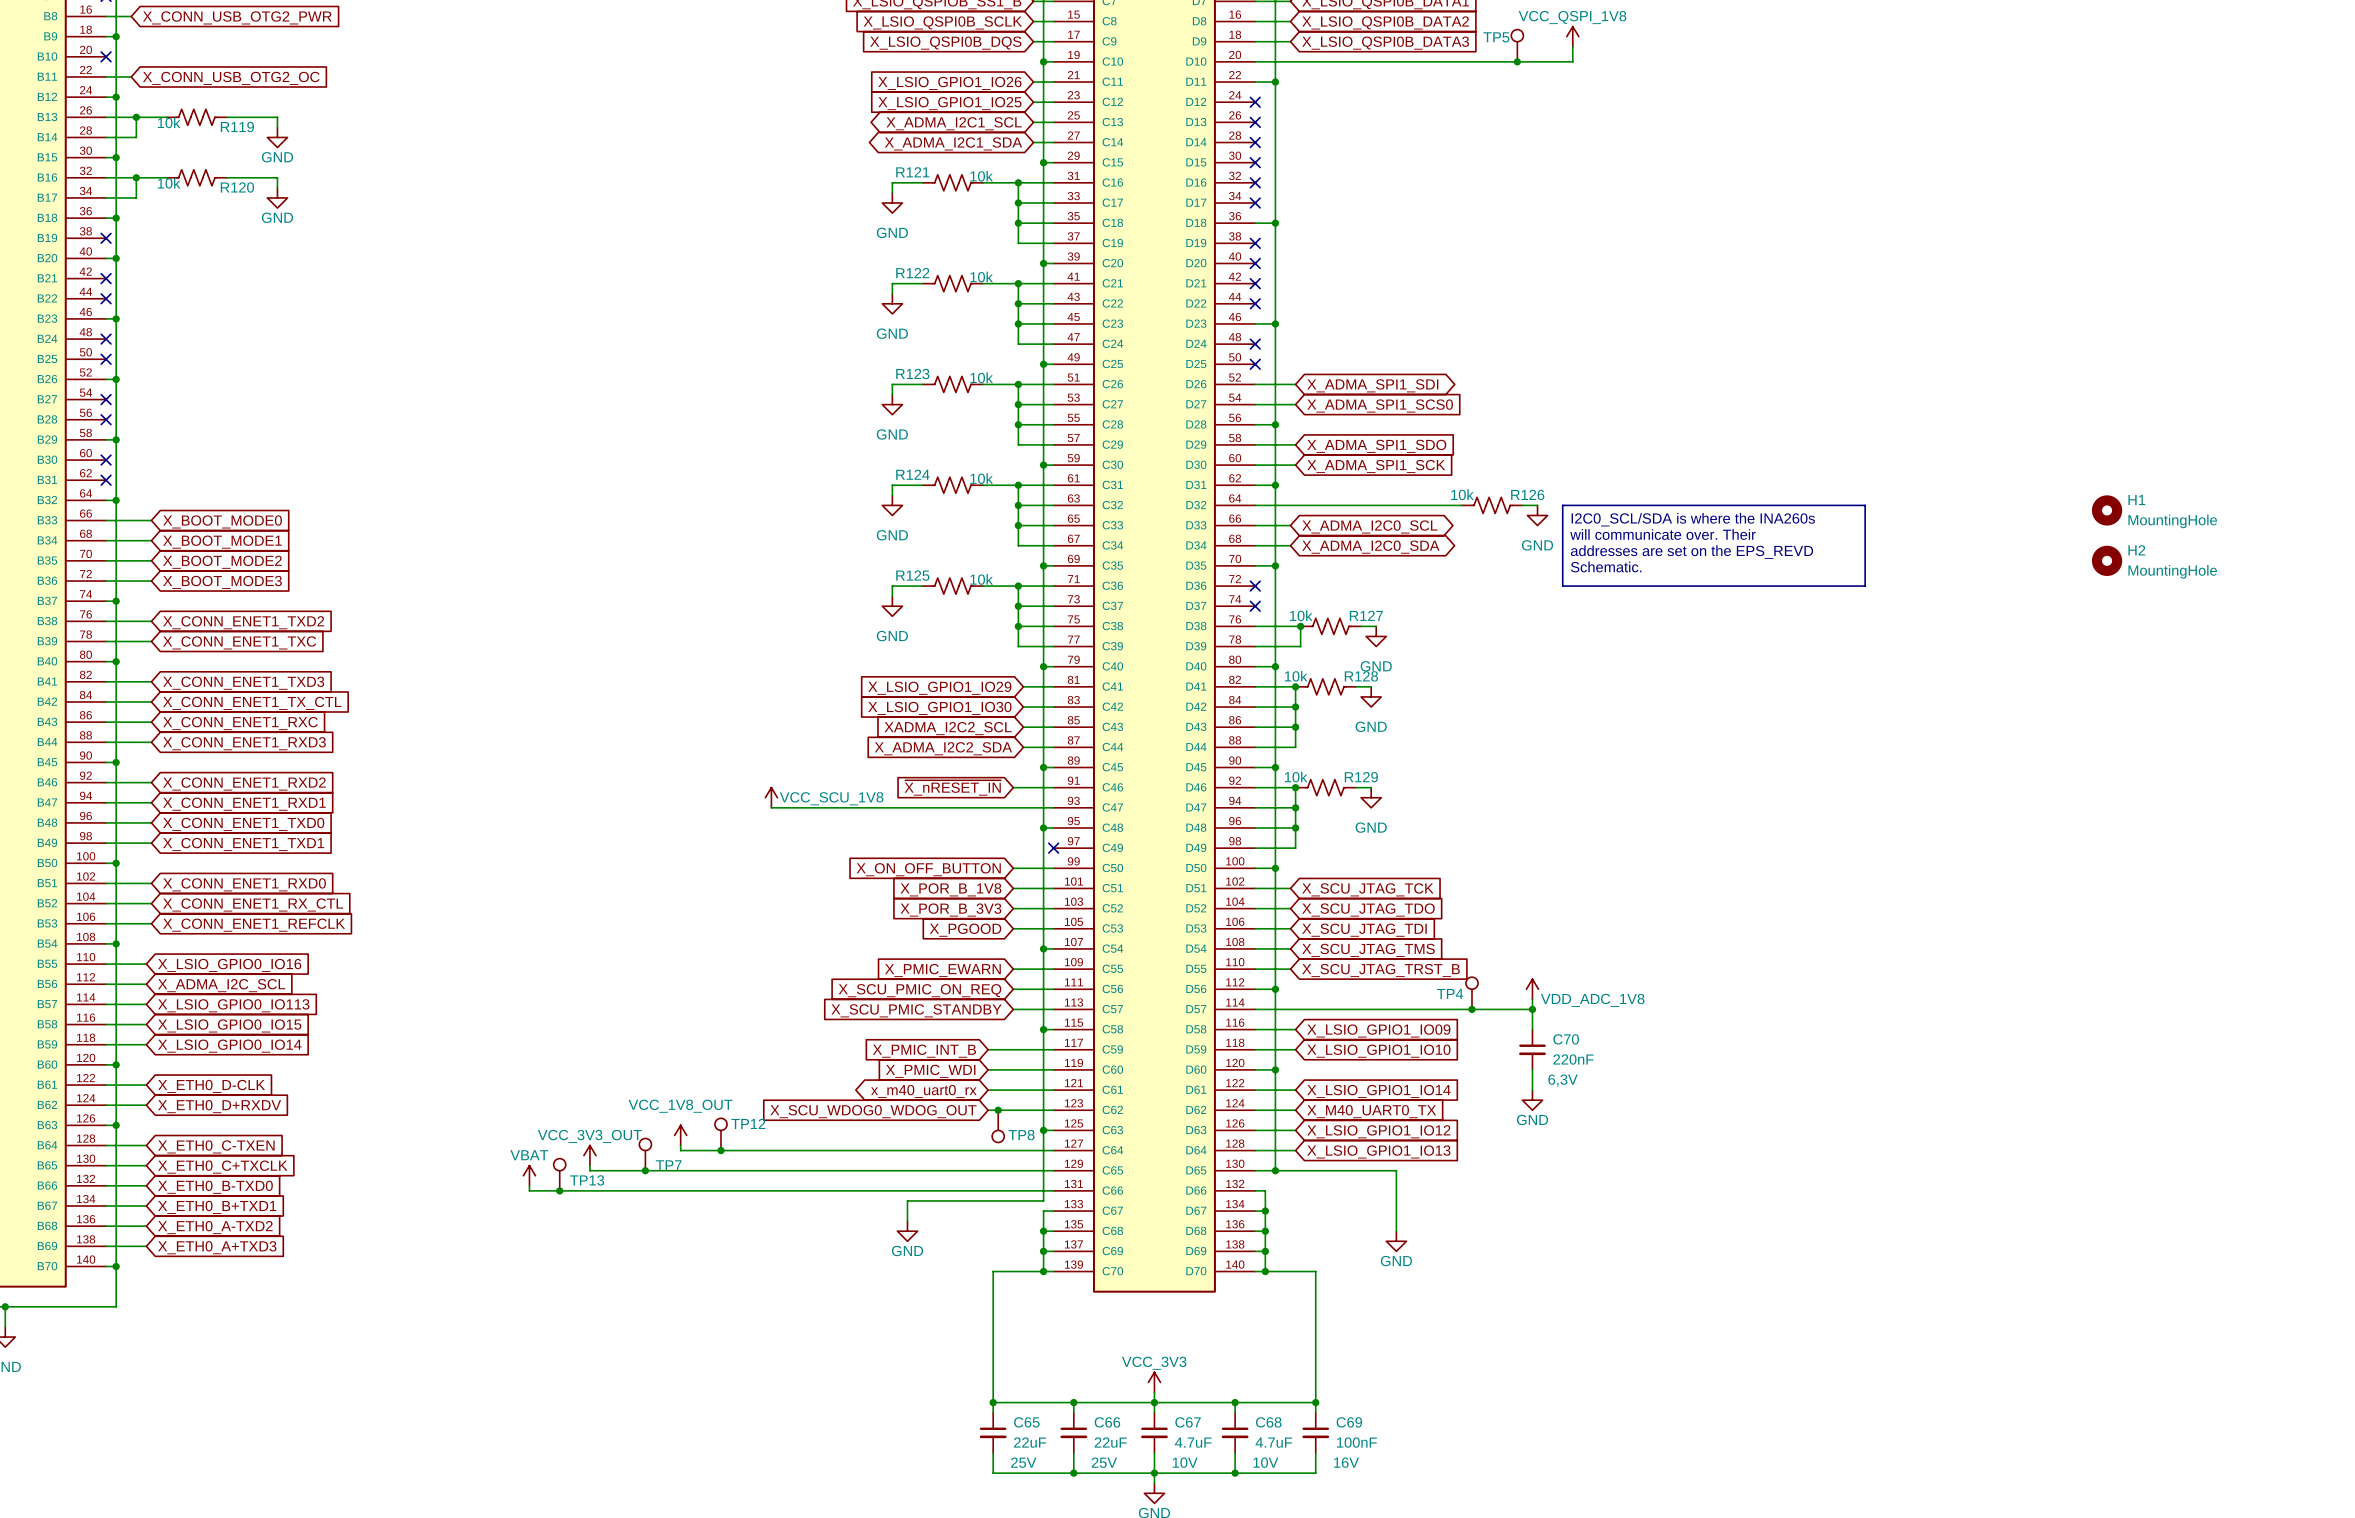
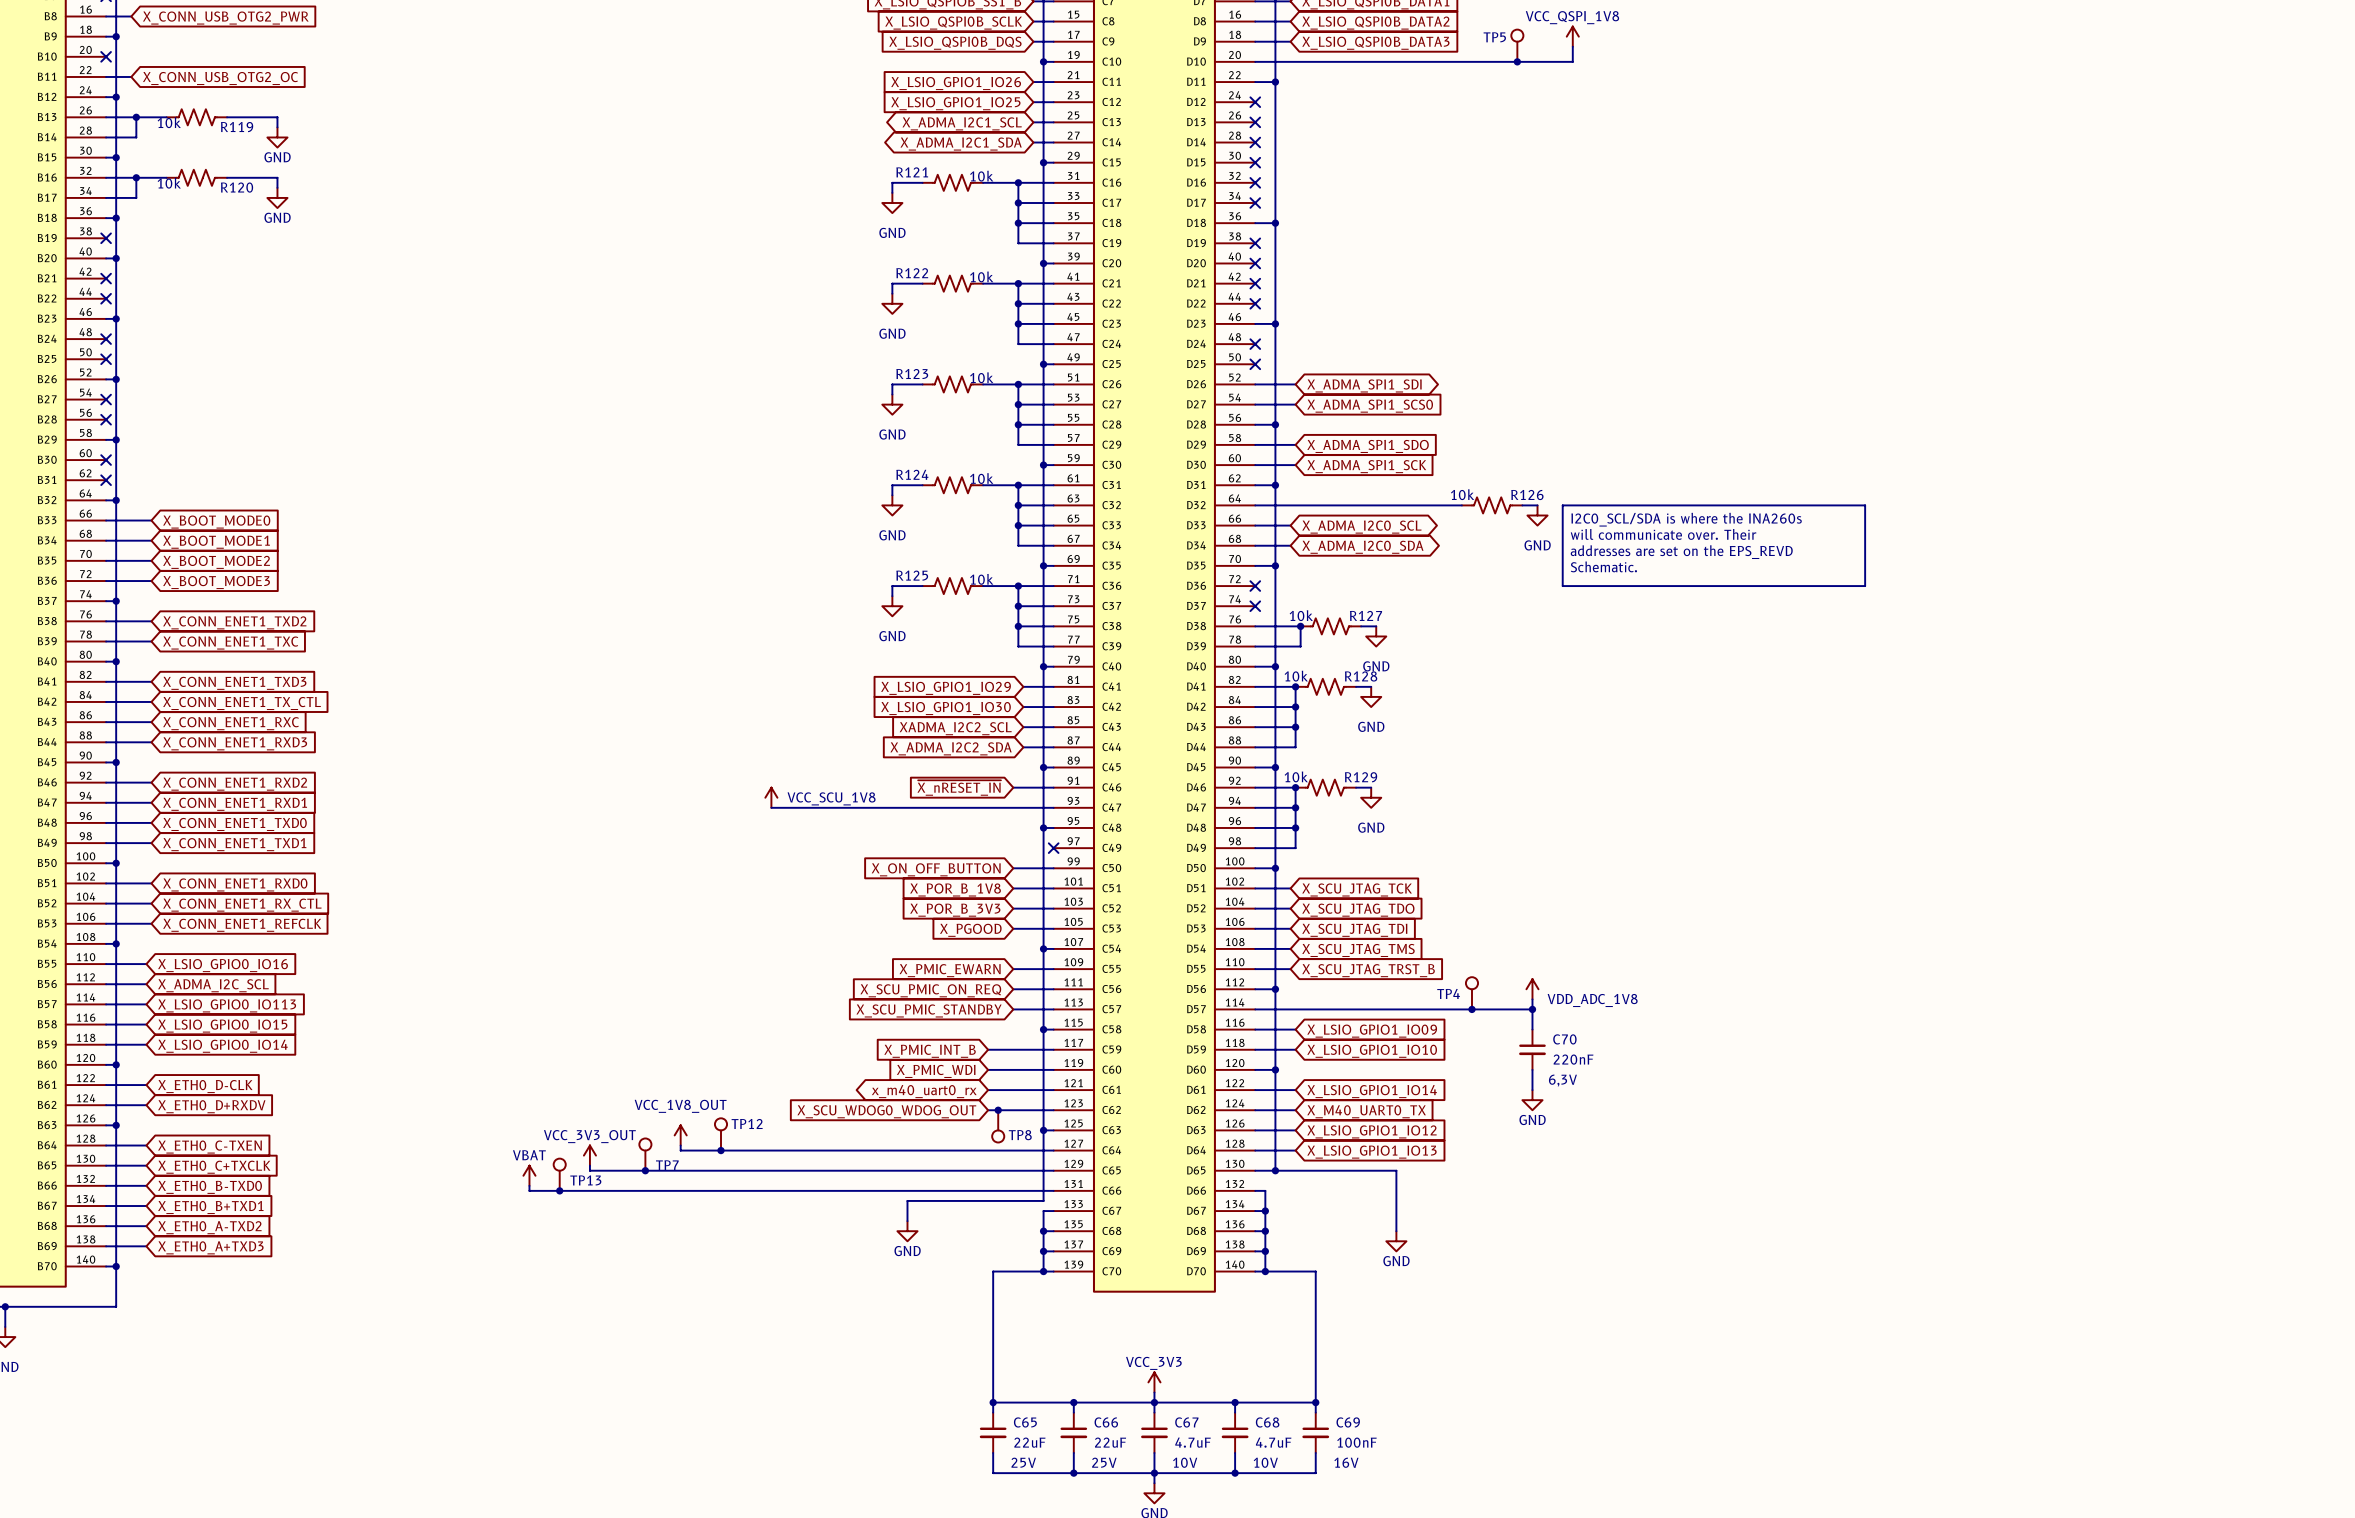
H1: MountingHole (2107, 510) -> none
H2: MountingHole (2107, 560) -> none

